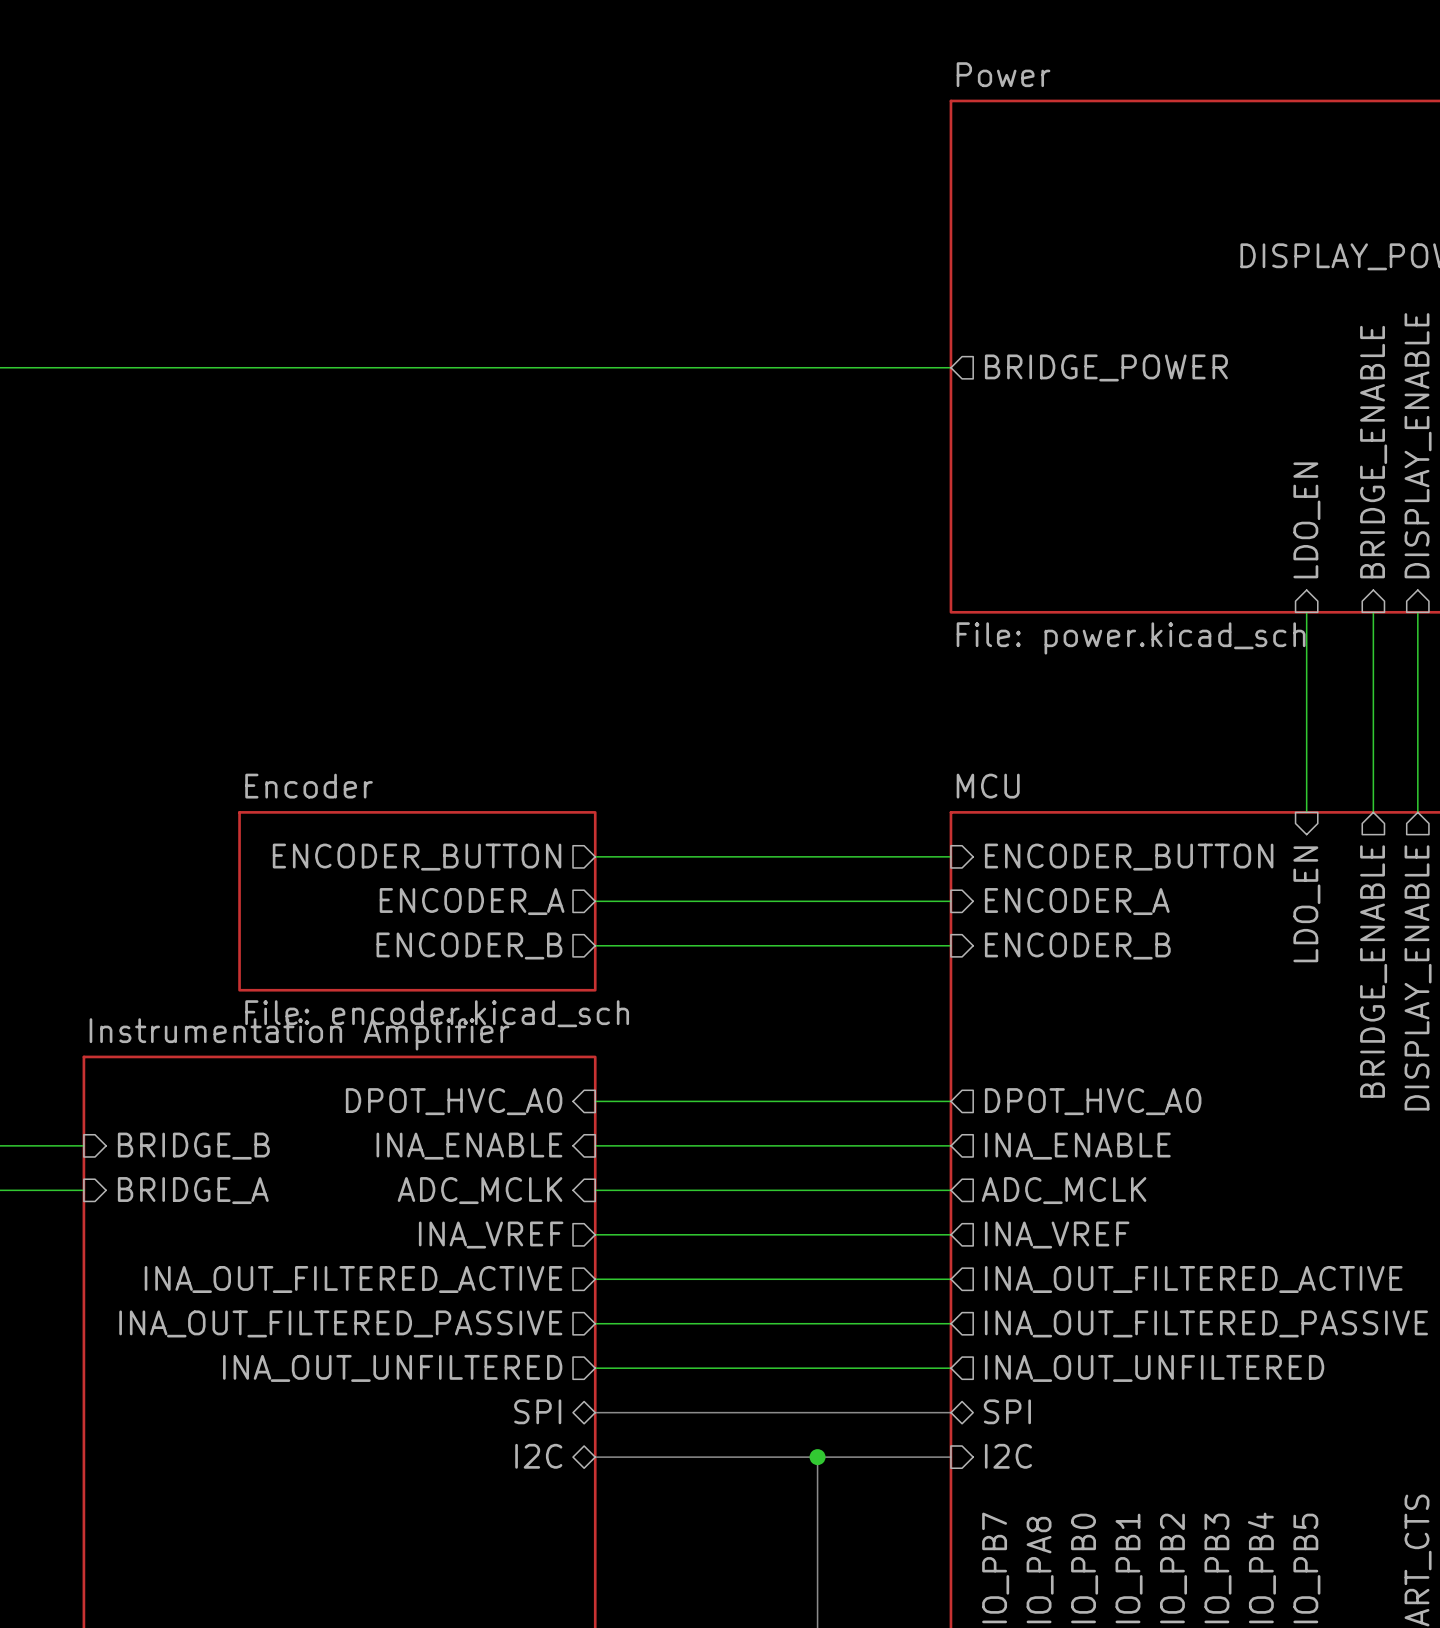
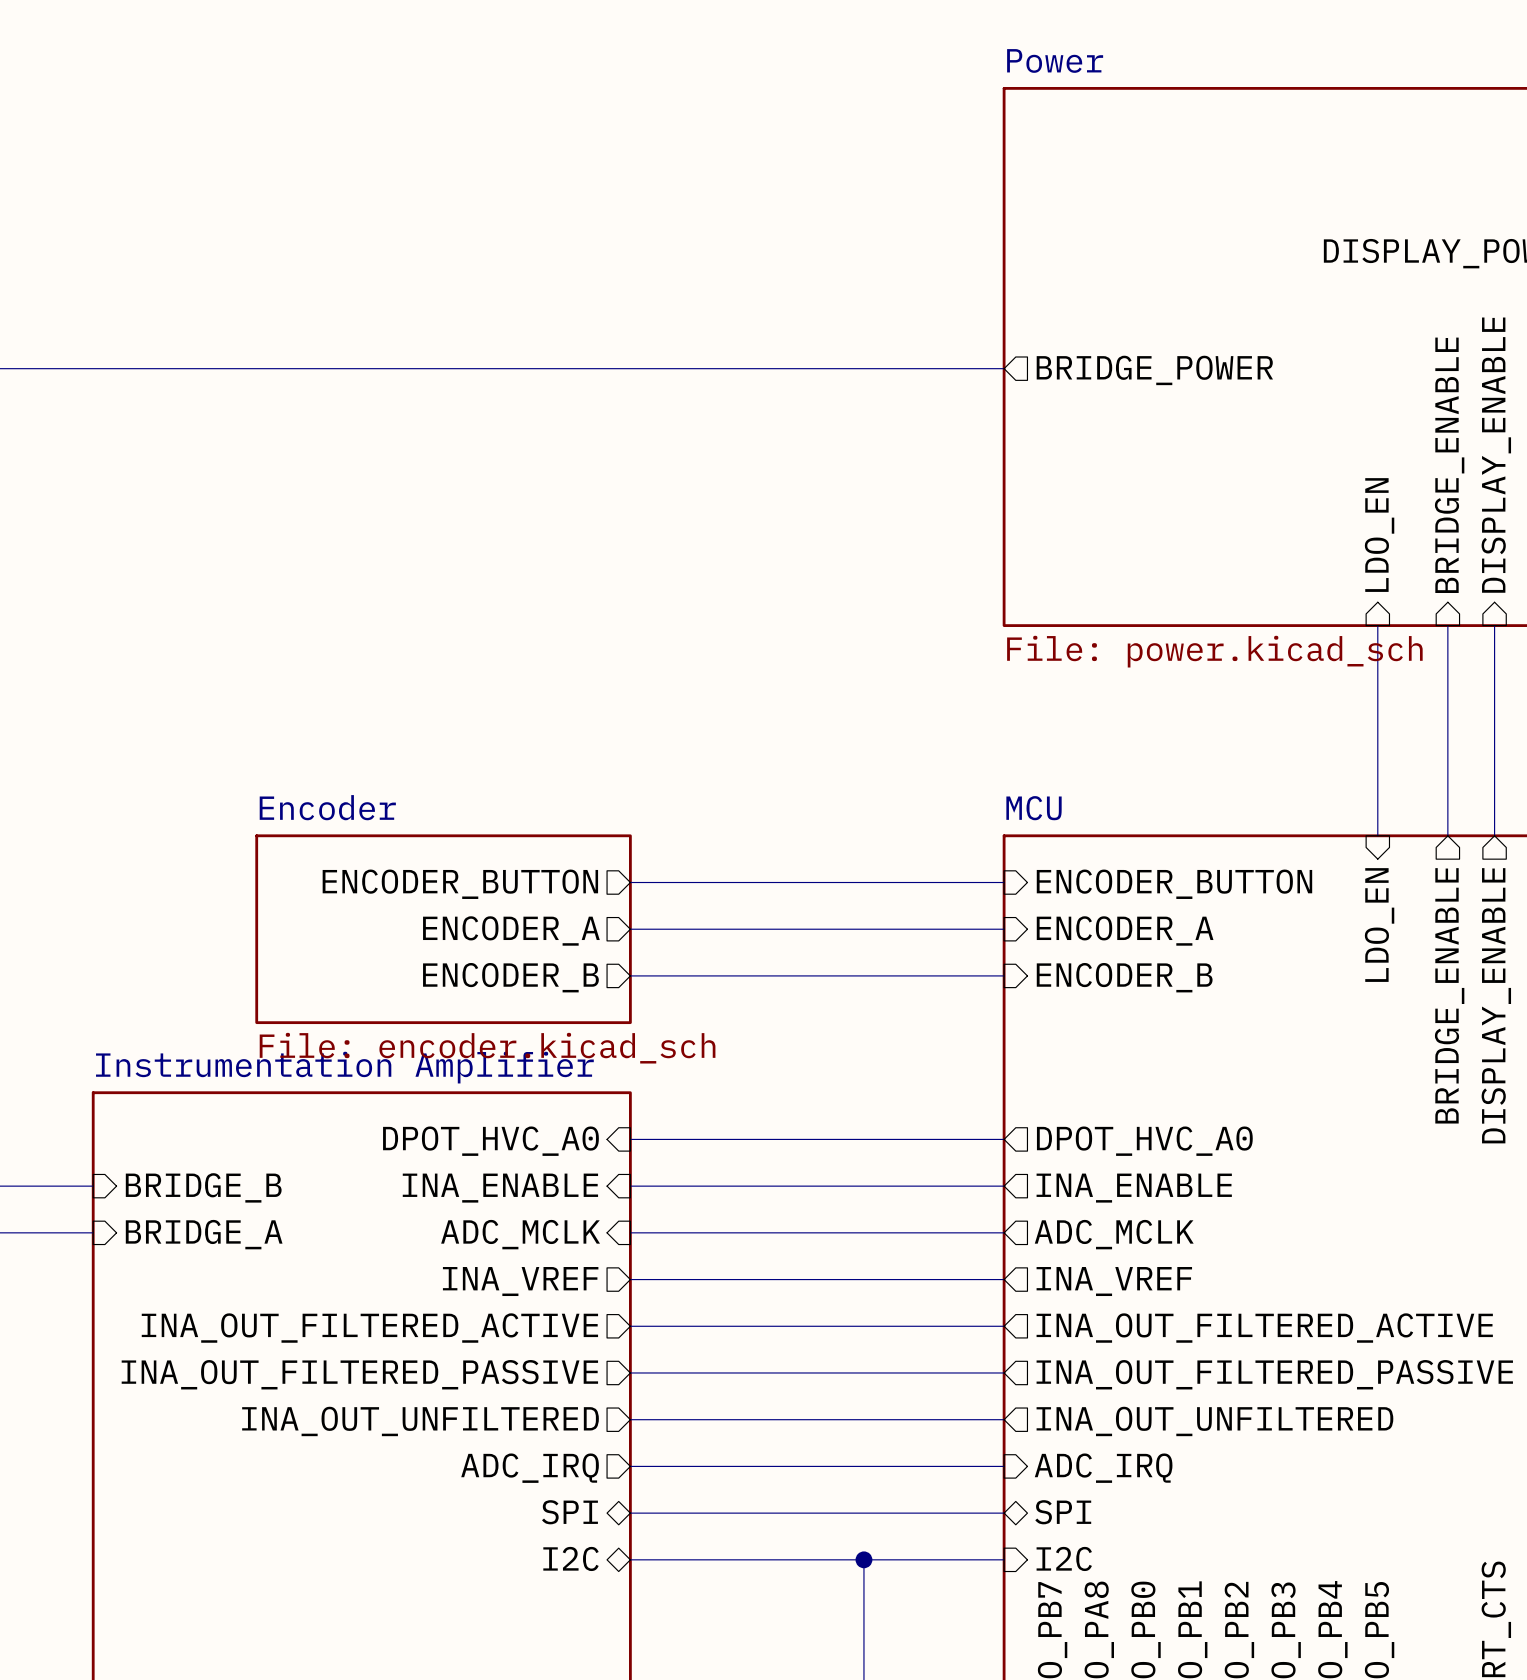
sheet pin shape: bidirectional (537, 1411) -> output (530, 1468)
sheet pin: SPI (537, 1411) -> ADC_IRQ (530, 1468)
sheet pin shape: bidirectional (1007, 1411) -> input (1103, 1468)
sheet pin: SPI (1007, 1411) -> ADC_IRQ (1103, 1468)
bus: (595, 1412) (950, 1412) -> (630, 1559) (1004, 1559)
sheet pin: I2C (538, 1456) -> SPI (569, 1512)
sheet pin shape: input (1008, 1456) -> bidirectional (1063, 1512)
sheet pin: I2C (1008, 1456) -> SPI (1063, 1512)
bus: (817, 1457) (817, 1501) -> none
junction position: (817, 1457) -> (863, 1559)
sheet pin: none -> I2C (570, 1558)
sheet pin: none -> I2C (1064, 1558)

